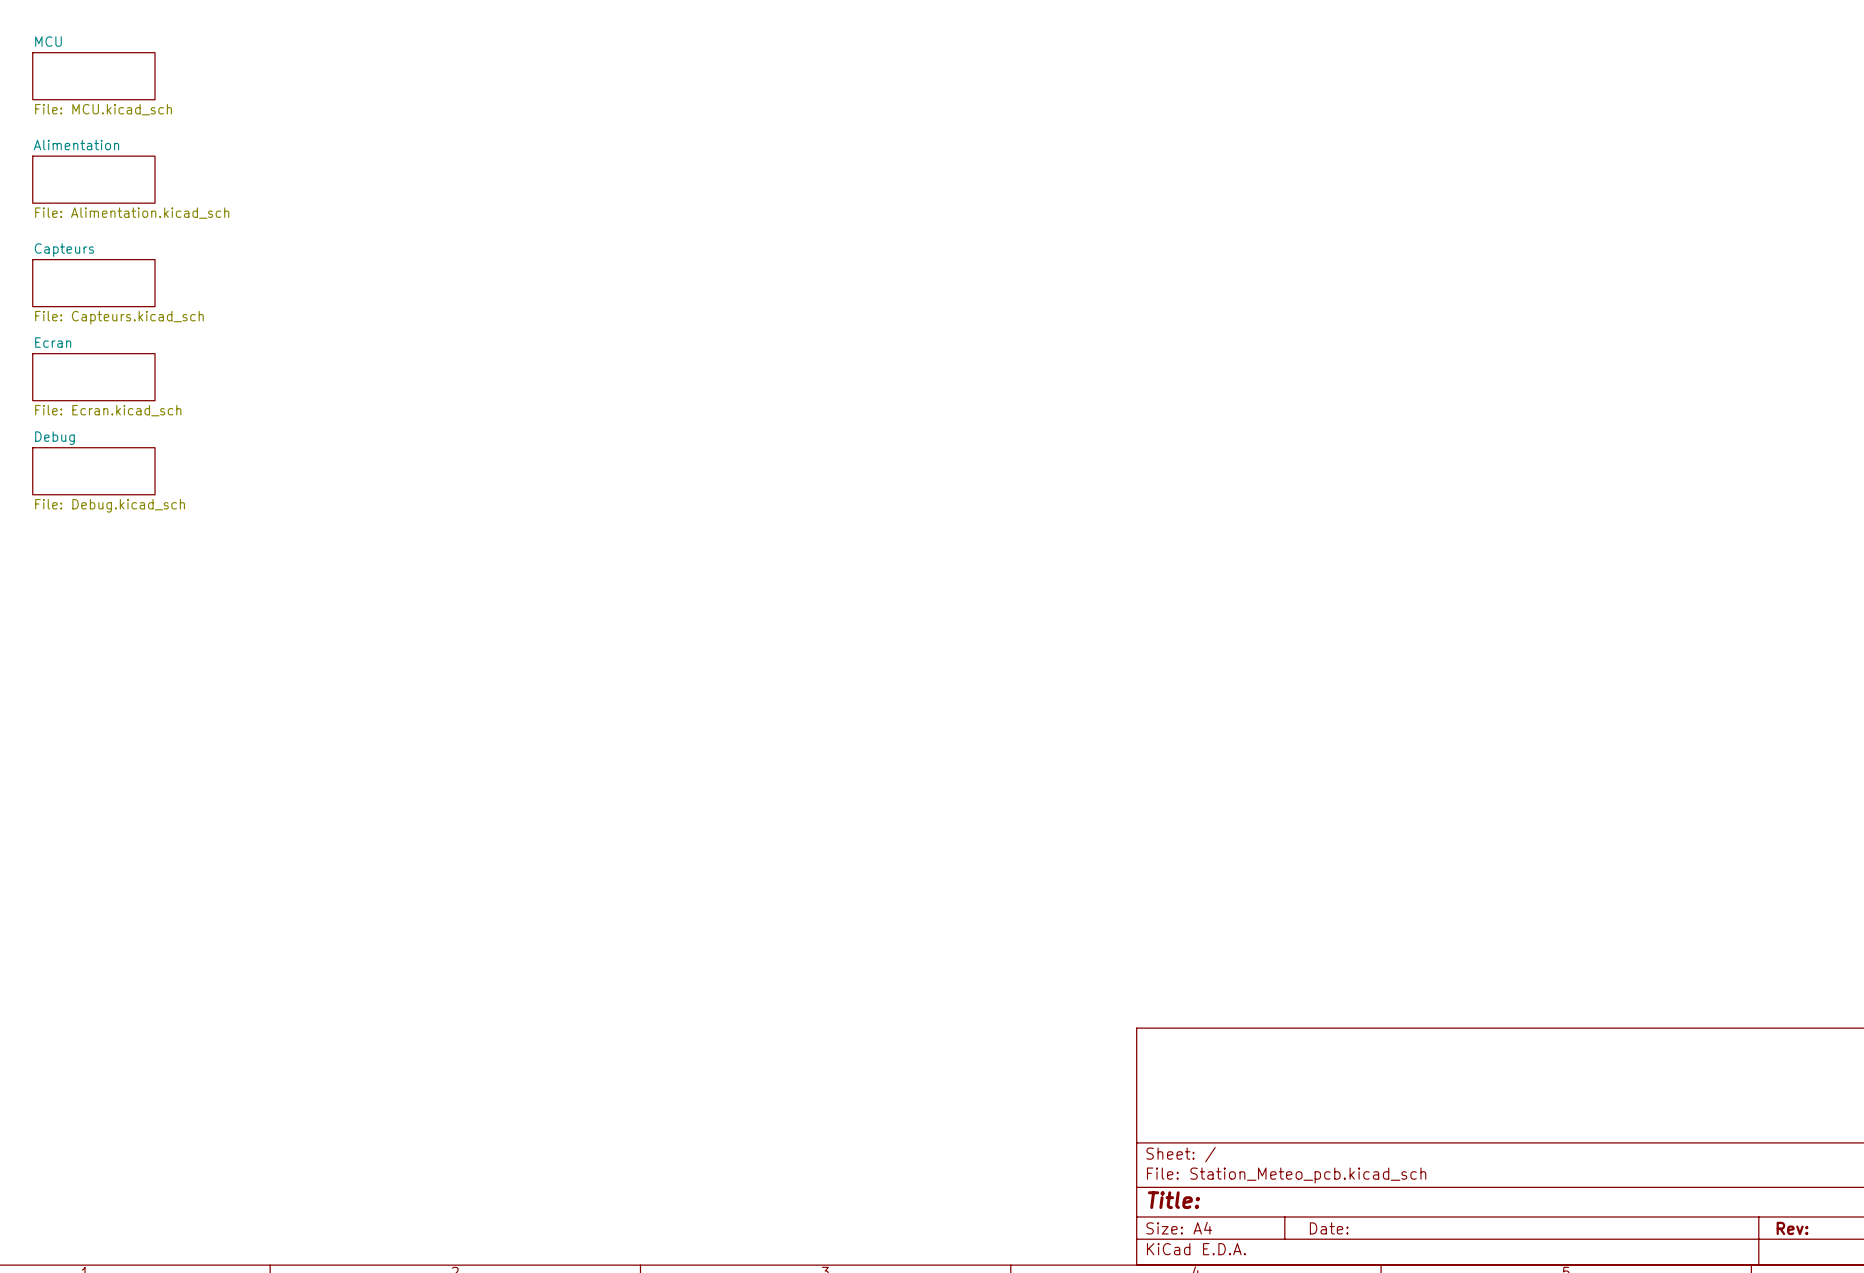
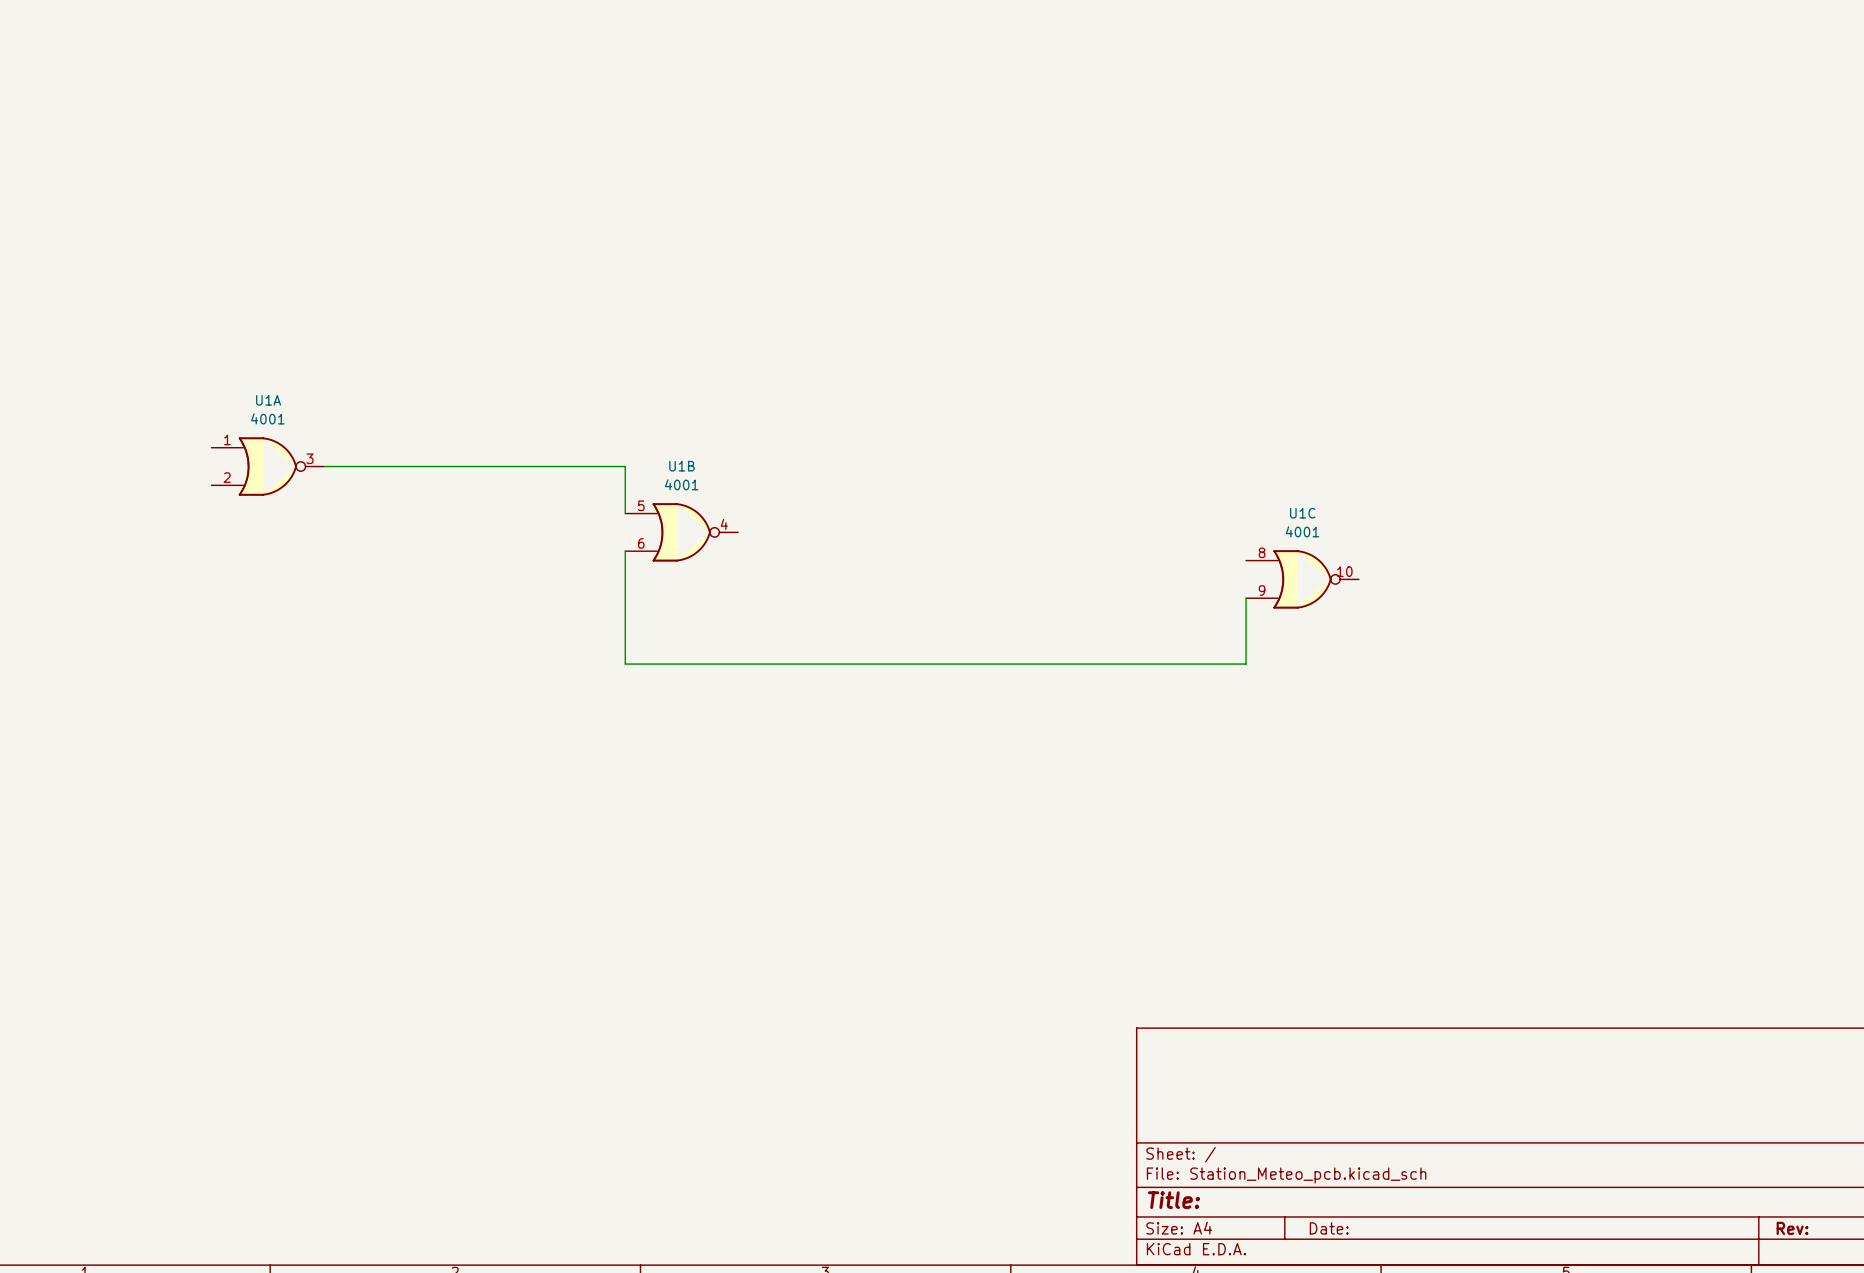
sheet MCU: File: MCU.kicad_sch (93, 76) -> none
sheet Alimentation: File: Alimentation.kicad_sch (93, 179) -> none
sheet Capteurs: File: Capteurs.kicad_sch (93, 283) -> none
sheet Ecran: File: Ecran.kicad_sch (93, 377) -> none
U1A: none -> 4001 (267, 466)
wire: none -> (324, 466) (625, 466) (625, 513)
sheet Debug: File: Debug.kicad_sch (93, 471) -> none
U1B: none -> 4001 (681, 532)
wire: none -> (625, 551) (625, 664) (1246, 664) (1246, 598)
U1C: none -> 4001 (1302, 579)

